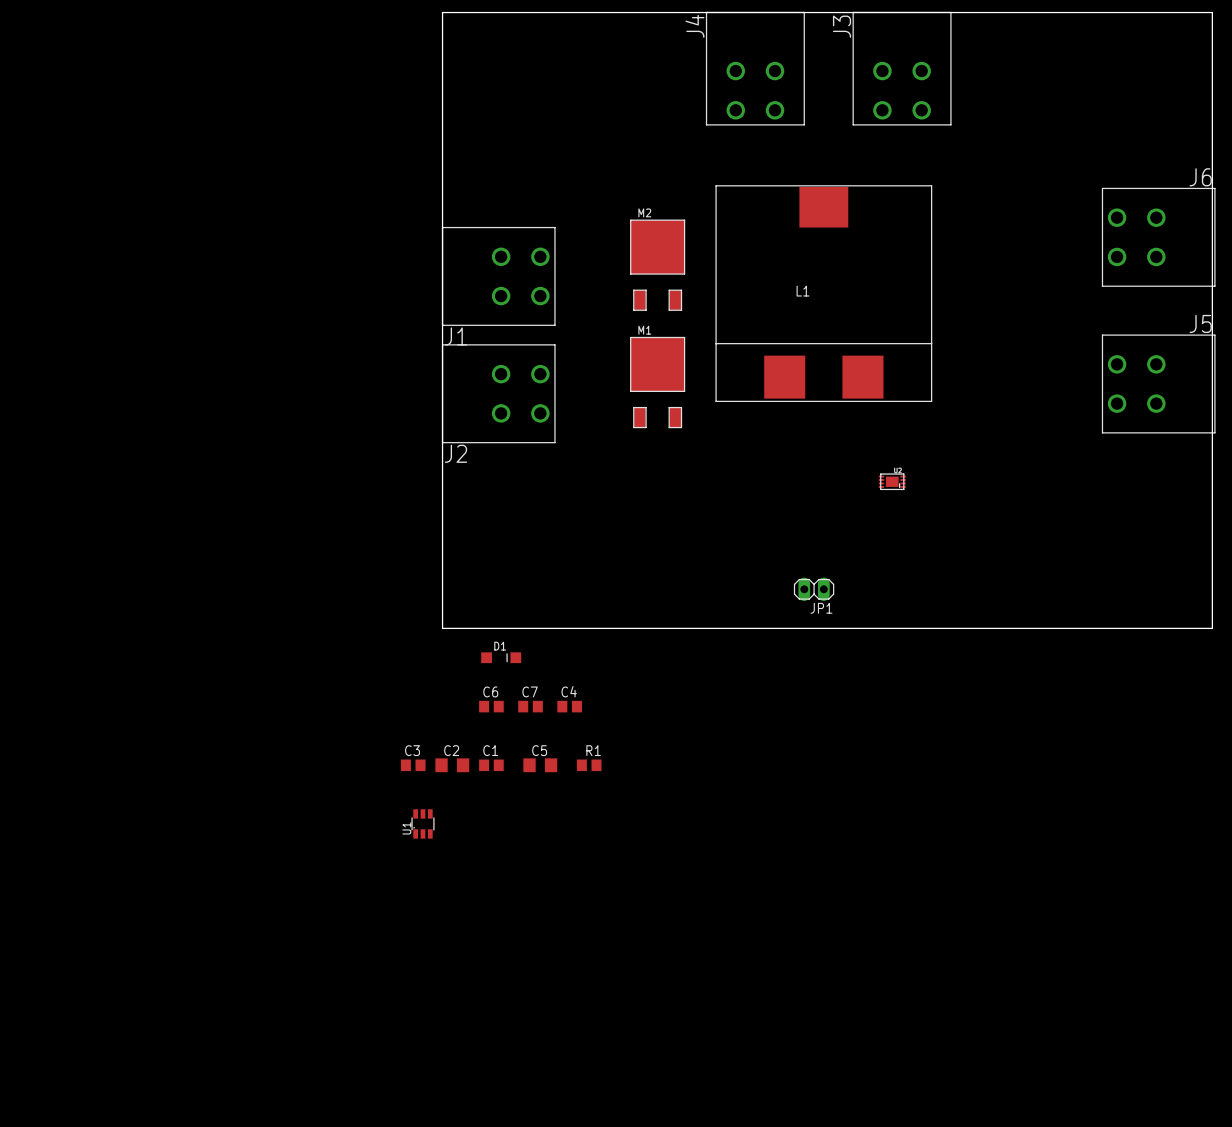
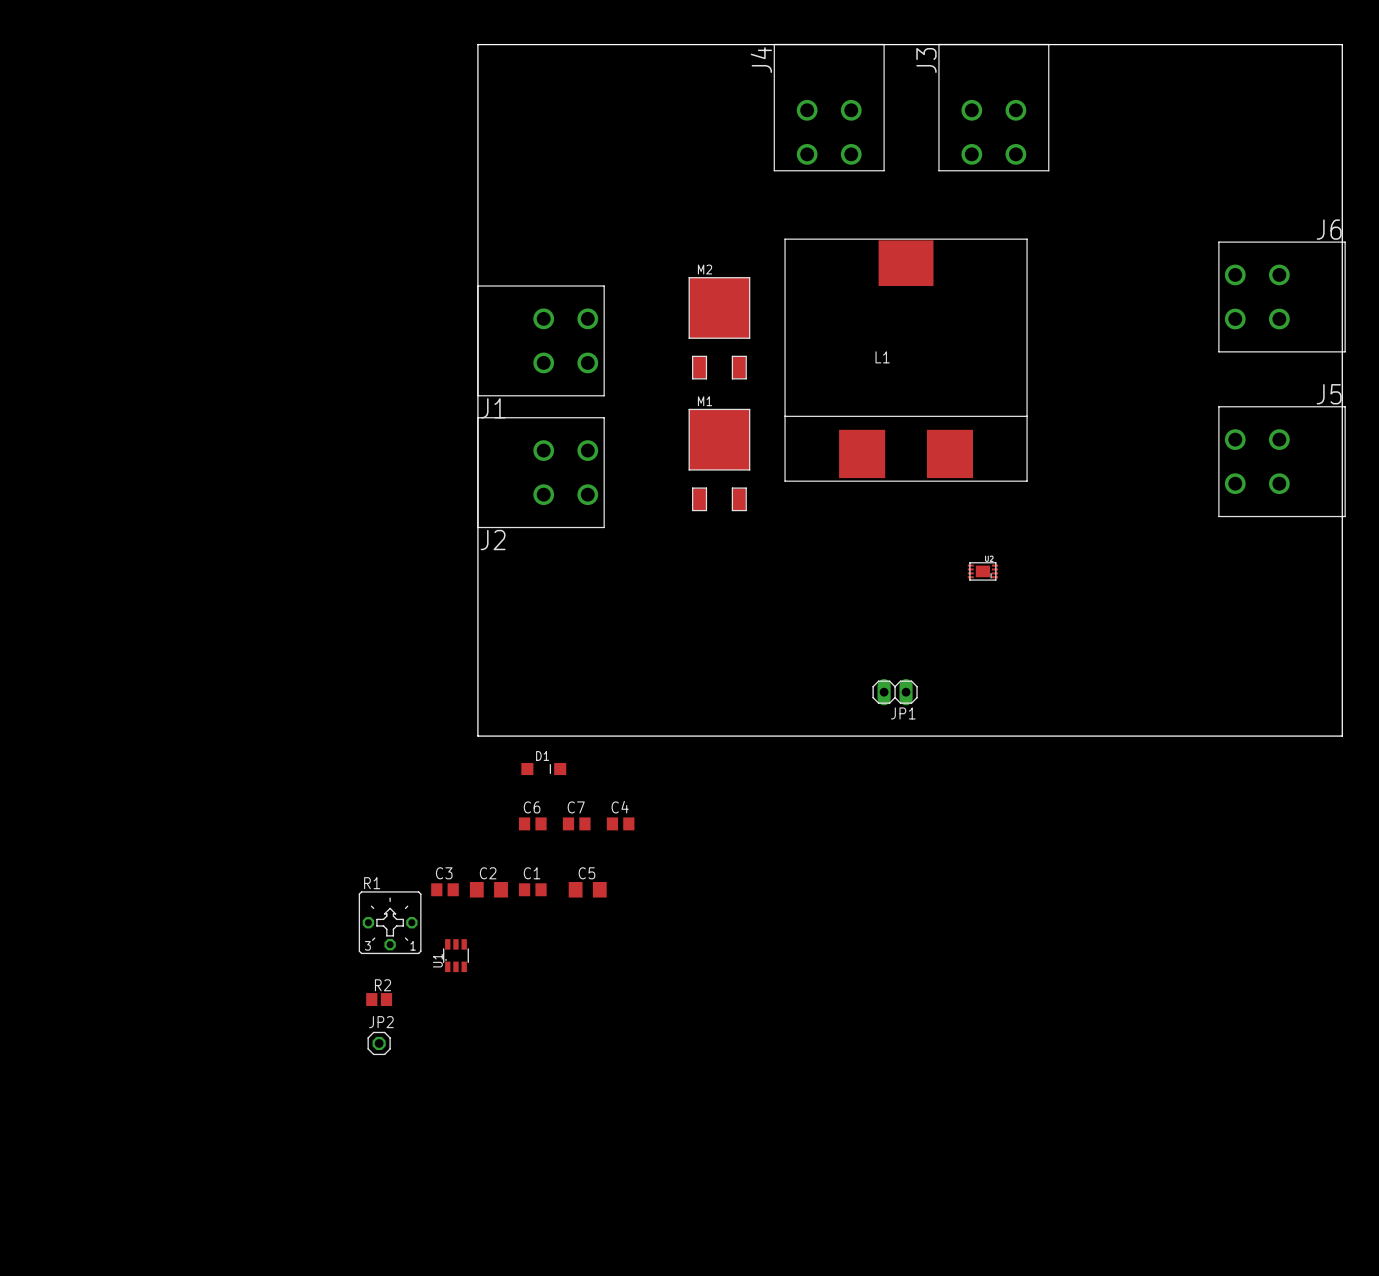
R1 name position: R1 (593, 750) -> R1 (372, 883)
R1 footprint: [576, 759, 602, 772] -> [358, 891, 422, 955]
R2: none -> (379, 999)
JP2: none -> (379, 1043)

